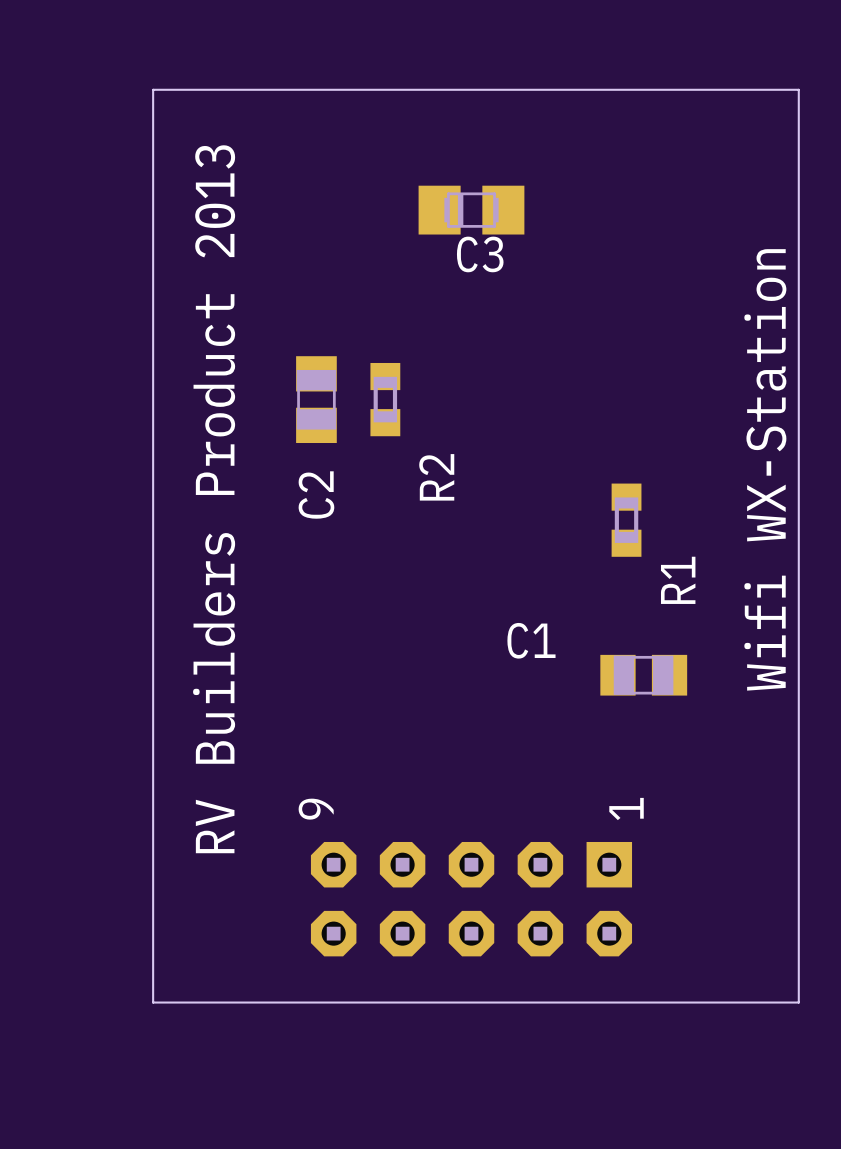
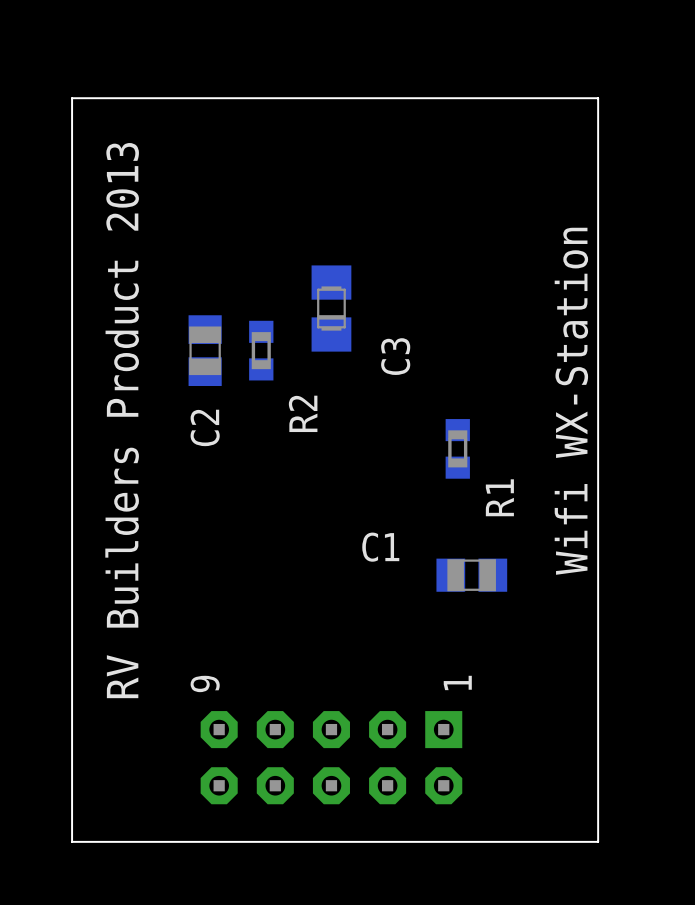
C3 rotation: 0° (471, 210) -> 90° counterclockwise (331, 308)
C3 position: (471, 210) -> (331, 308)
C3 name position: C3 (480, 254) -> C3 (395, 356)

